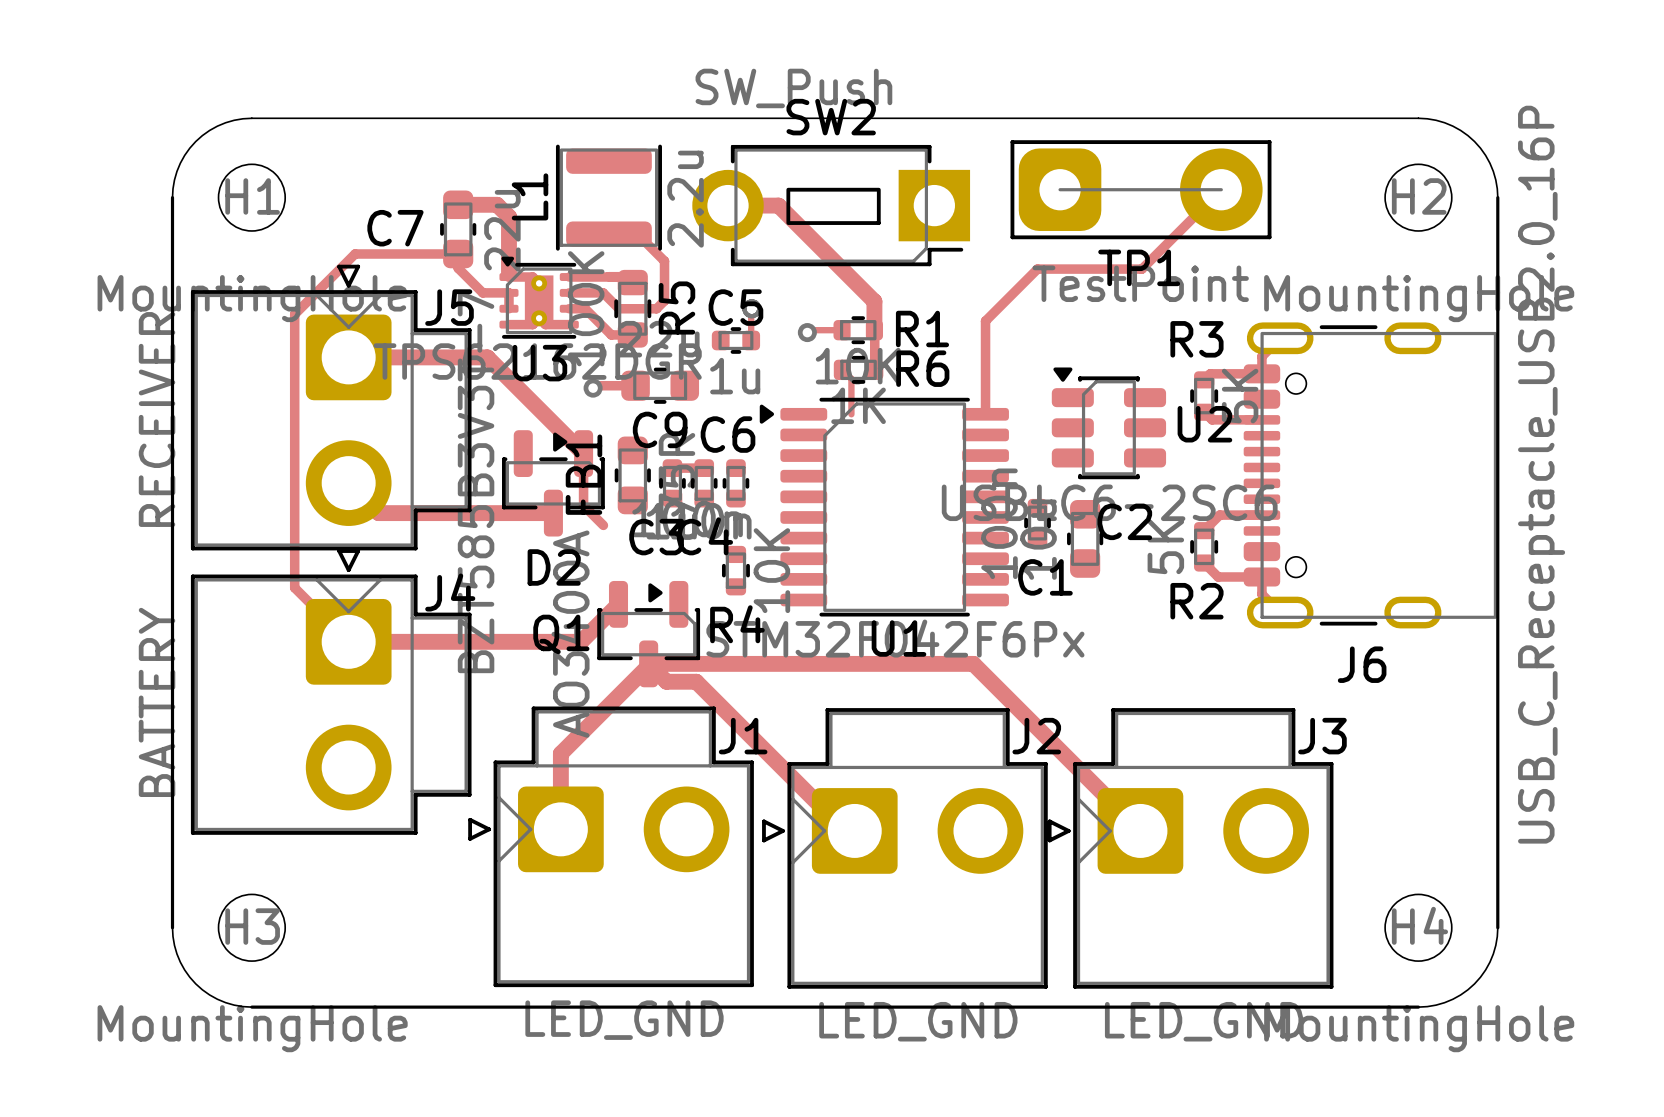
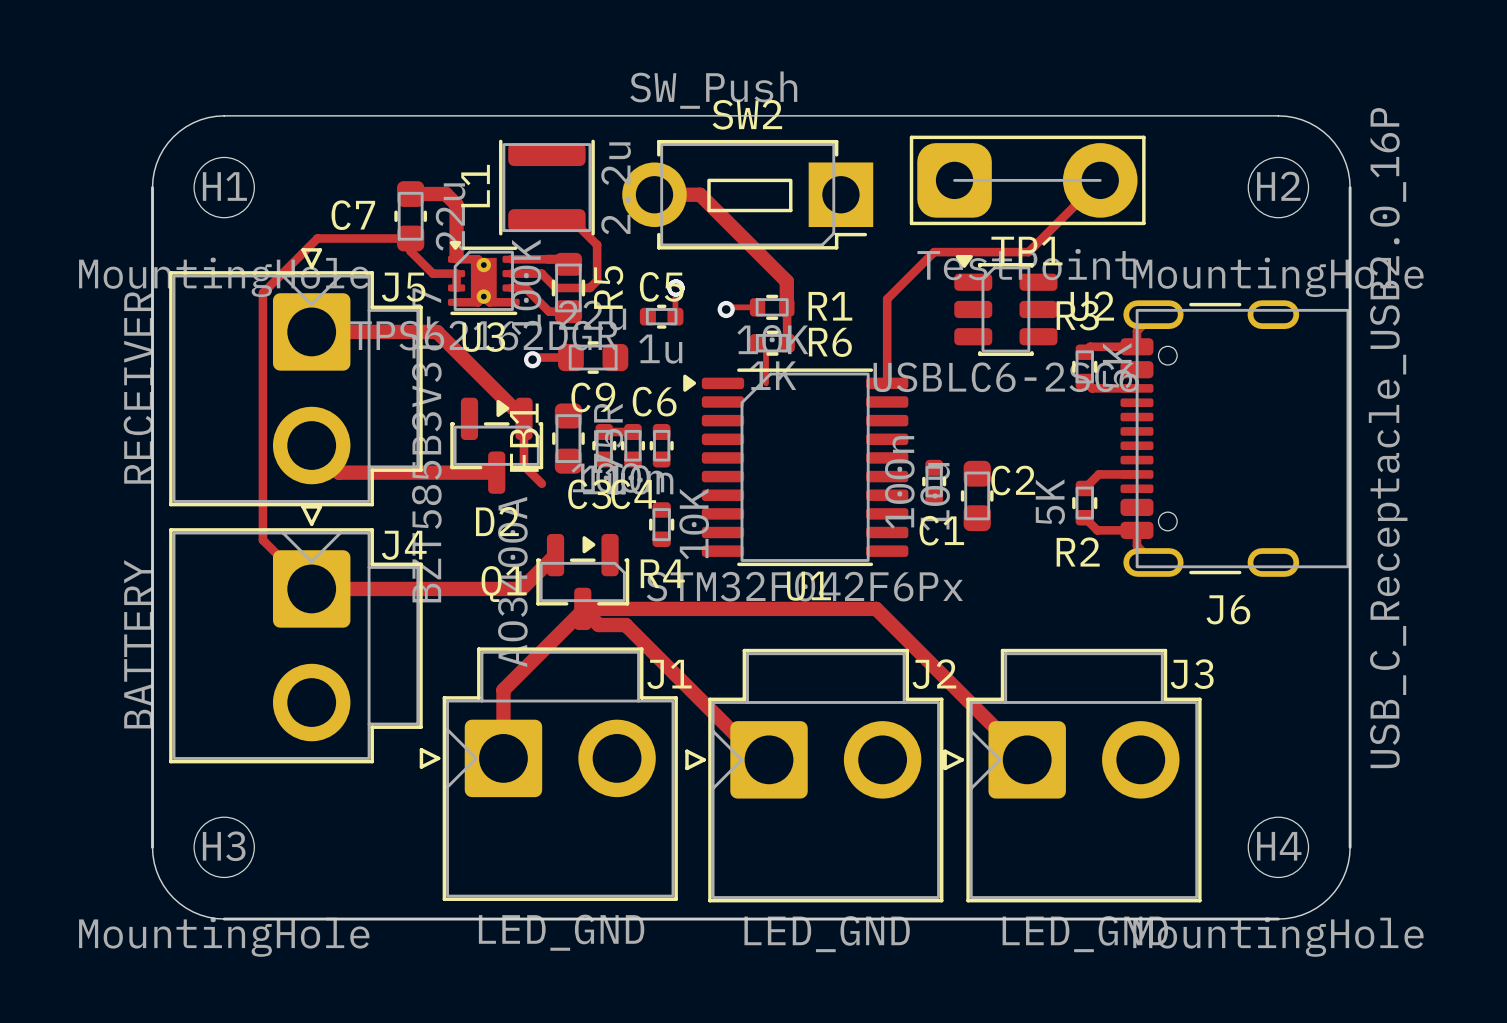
U2 position: (1108, 423) -> (1005, 305)

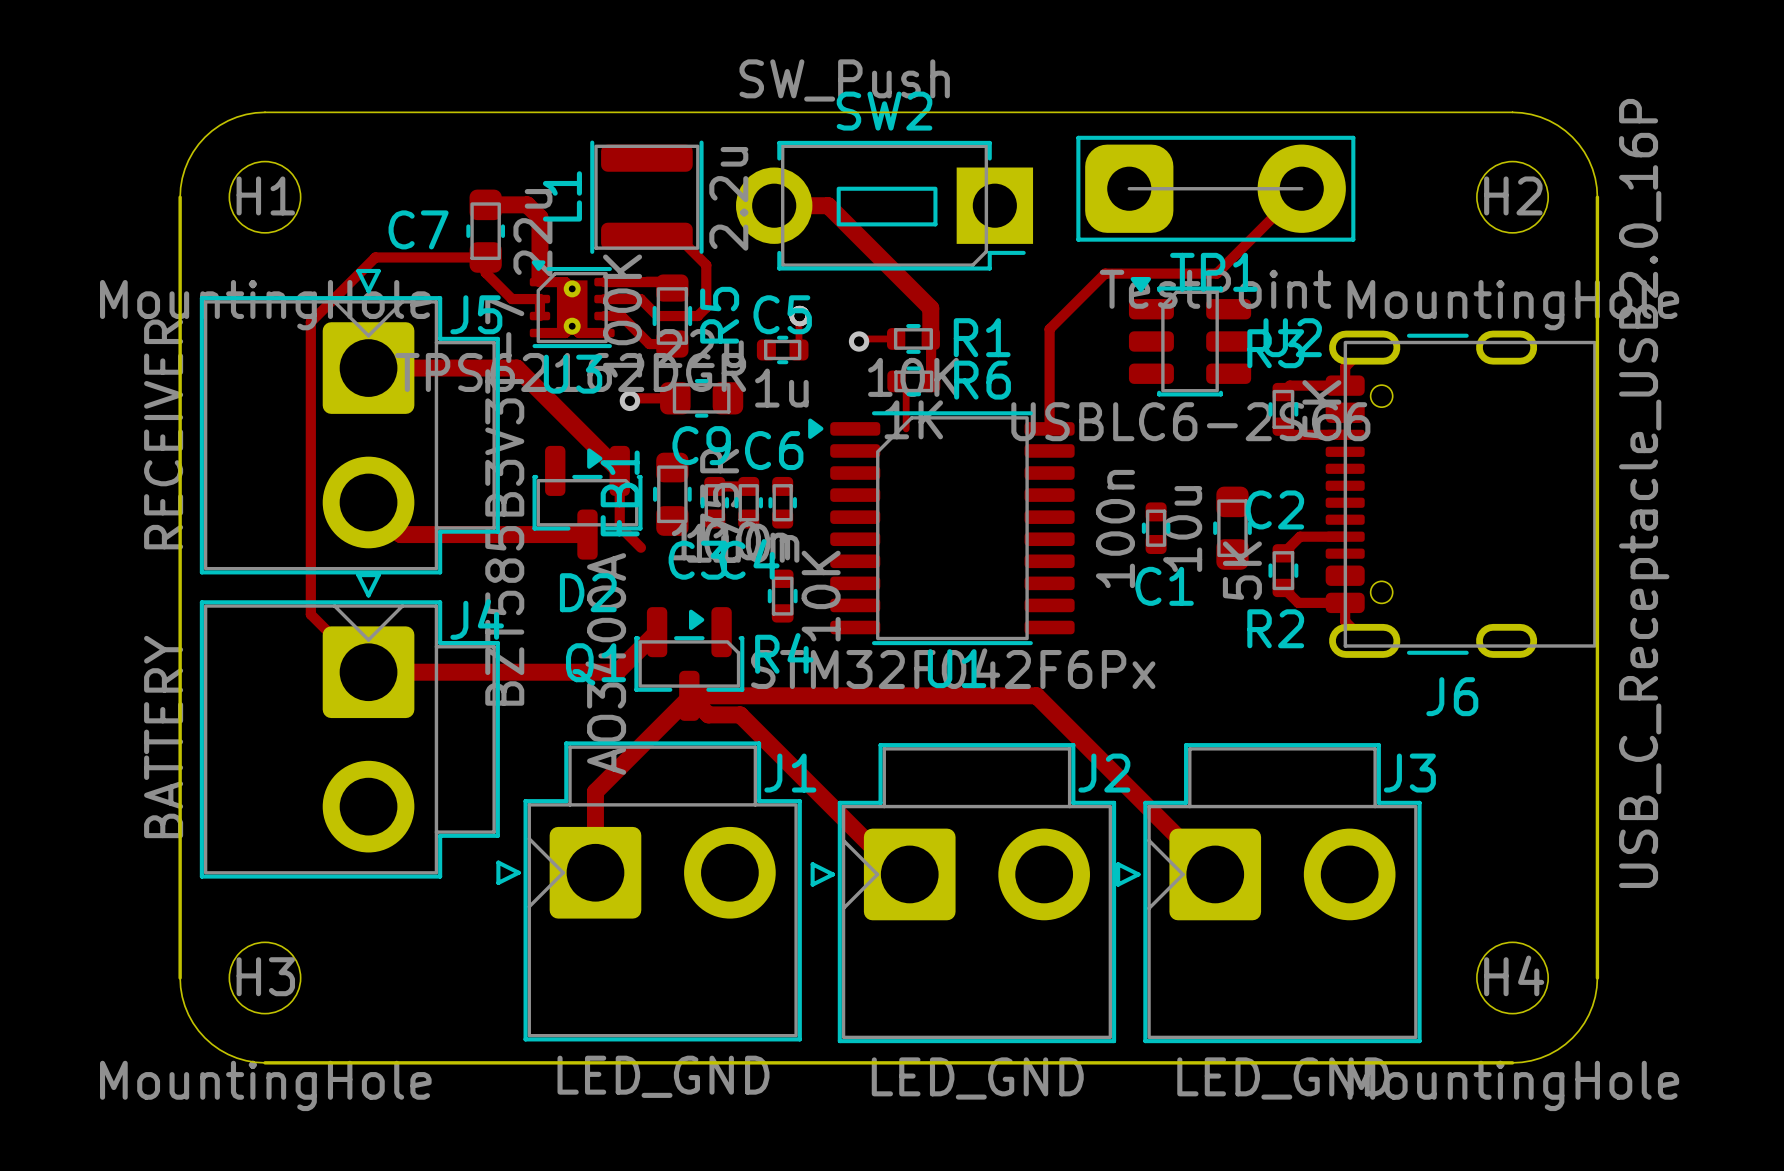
C1 position: (934, 481) -> (1156, 528)
C2 position: (977, 495) -> (1232, 528)

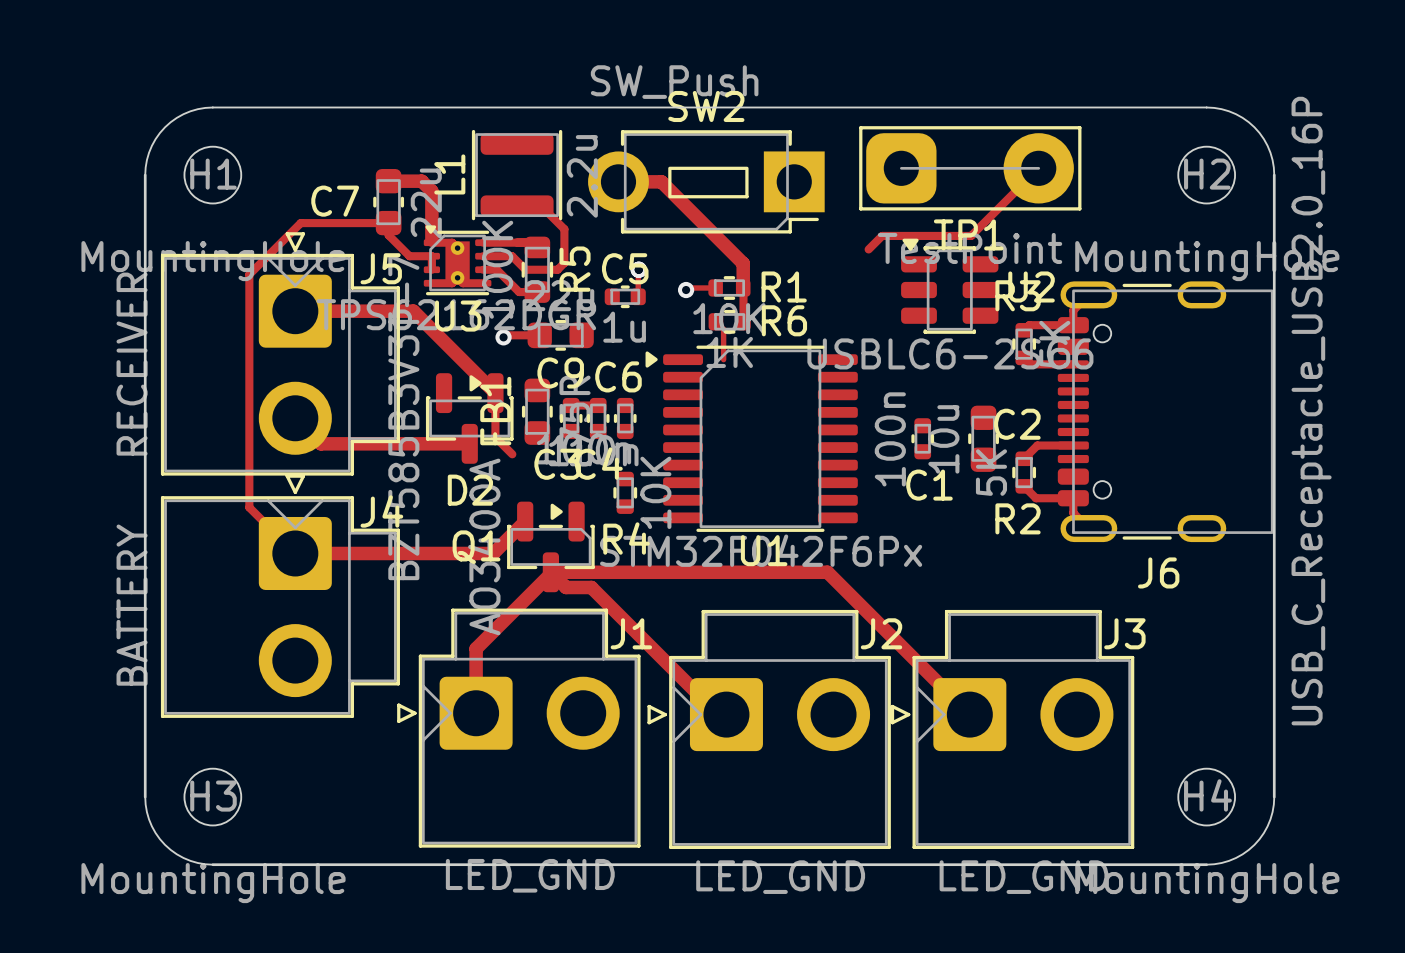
track: (1088, 290) (1049, 329) (1049, 428) -> none

